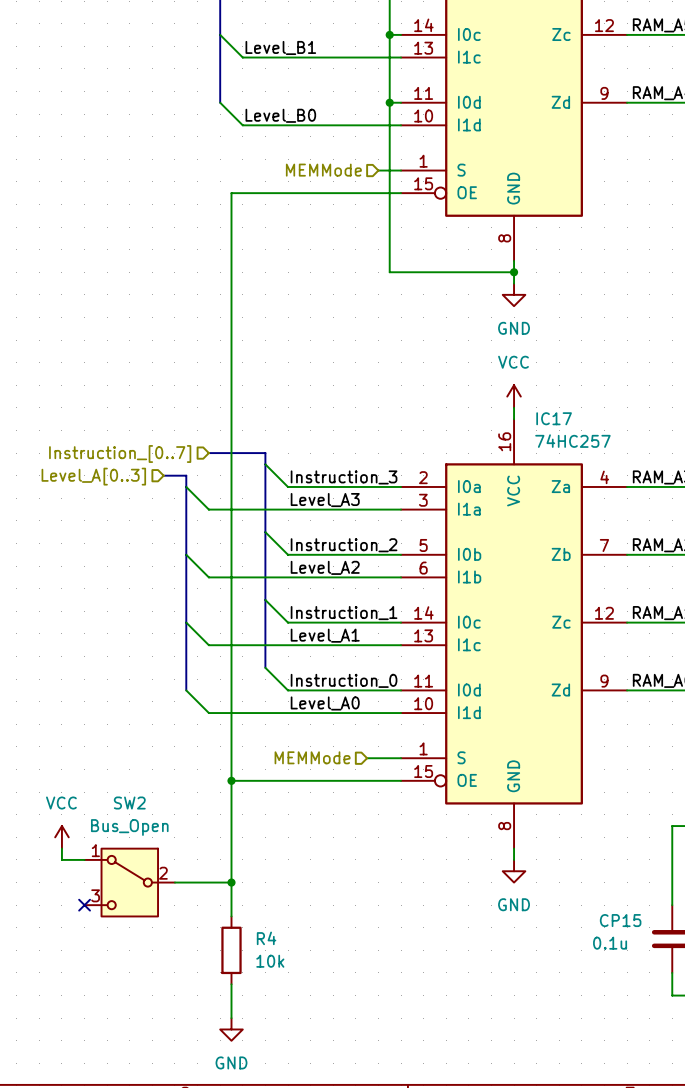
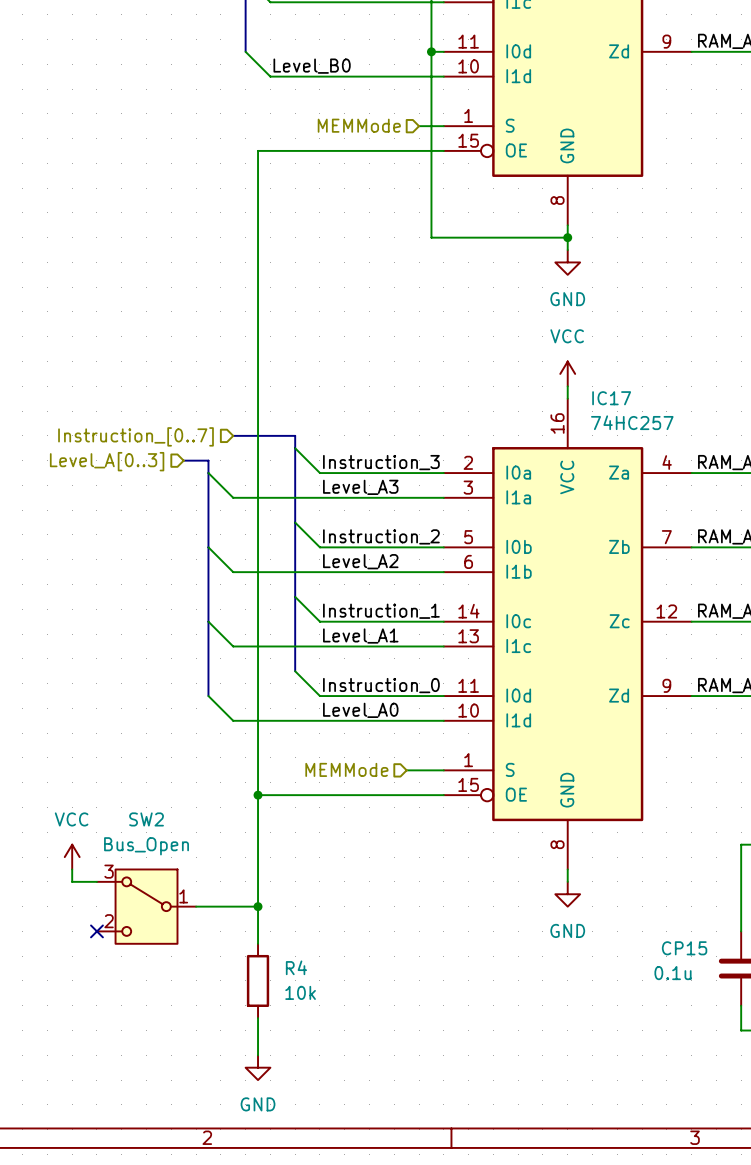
SW2 pin number: 1 (95, 850) -> 3 (109, 871)
SW2 pin number: 2 (163, 873) -> 1 (183, 896)
SW2 pin number: 3 (95, 895) -> 2 (109, 921)

